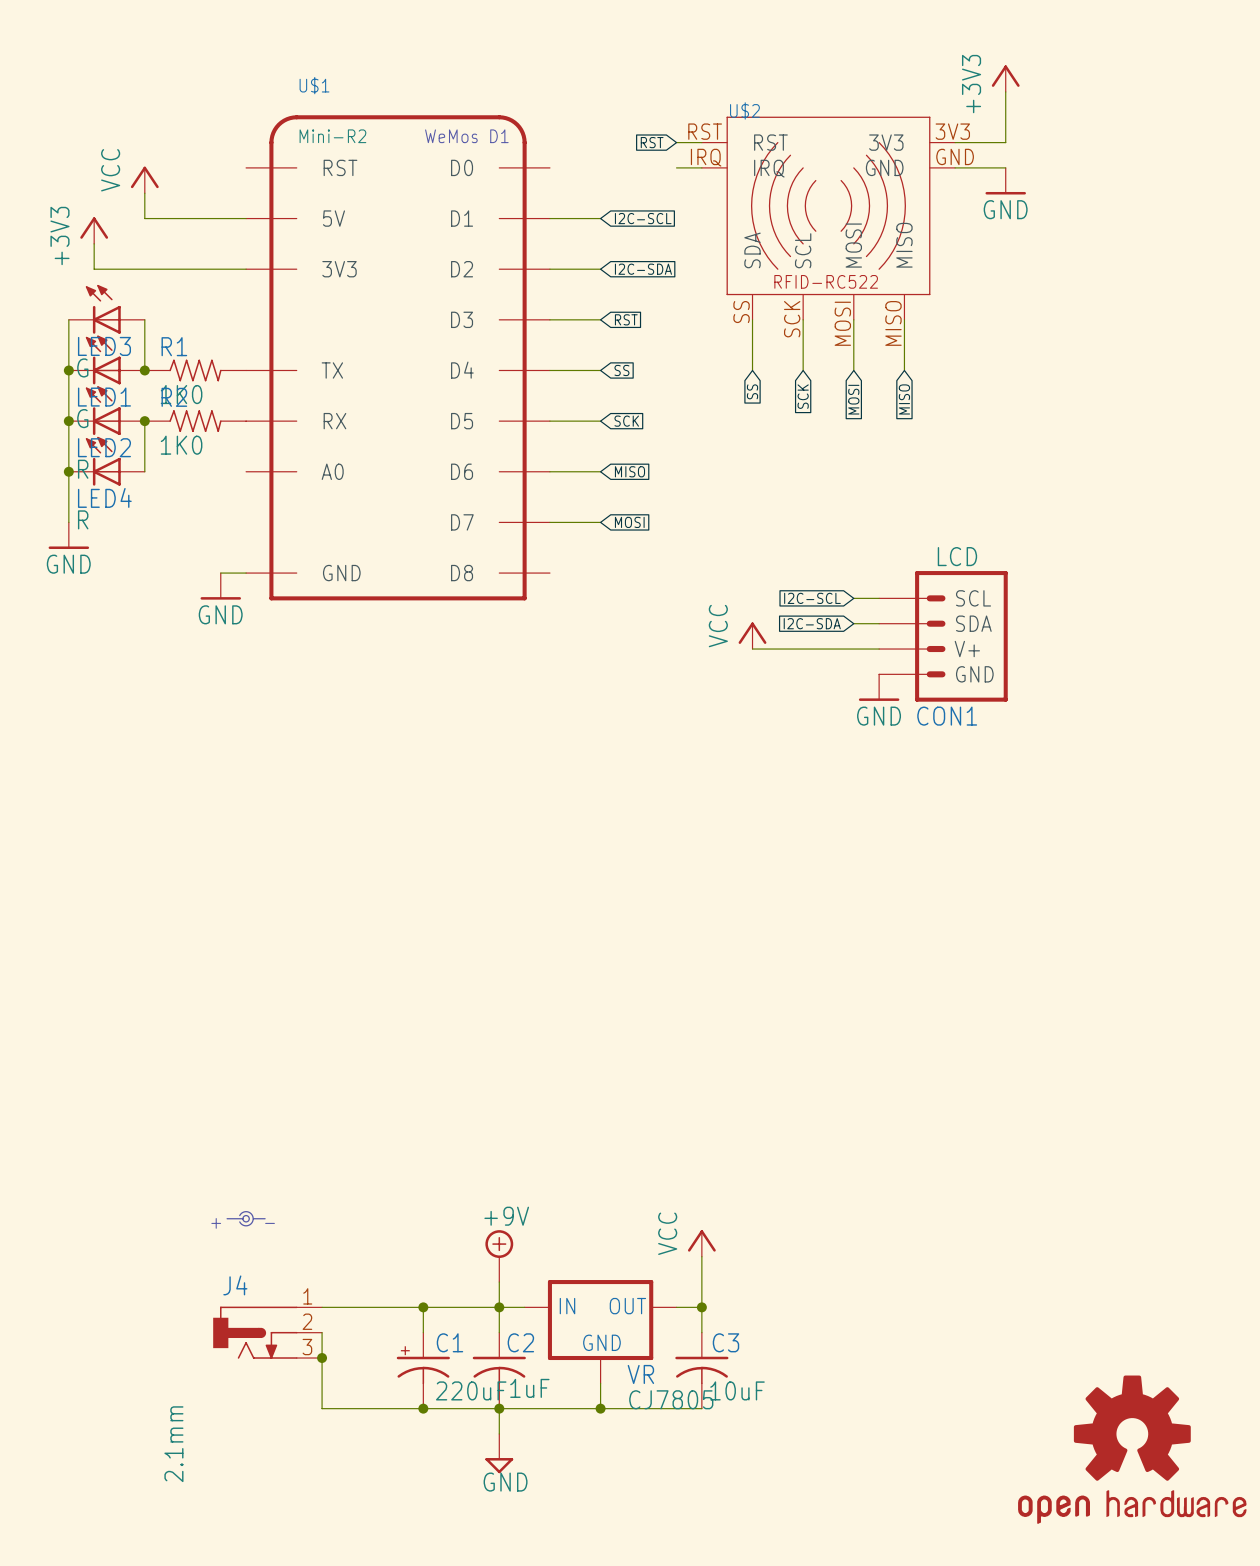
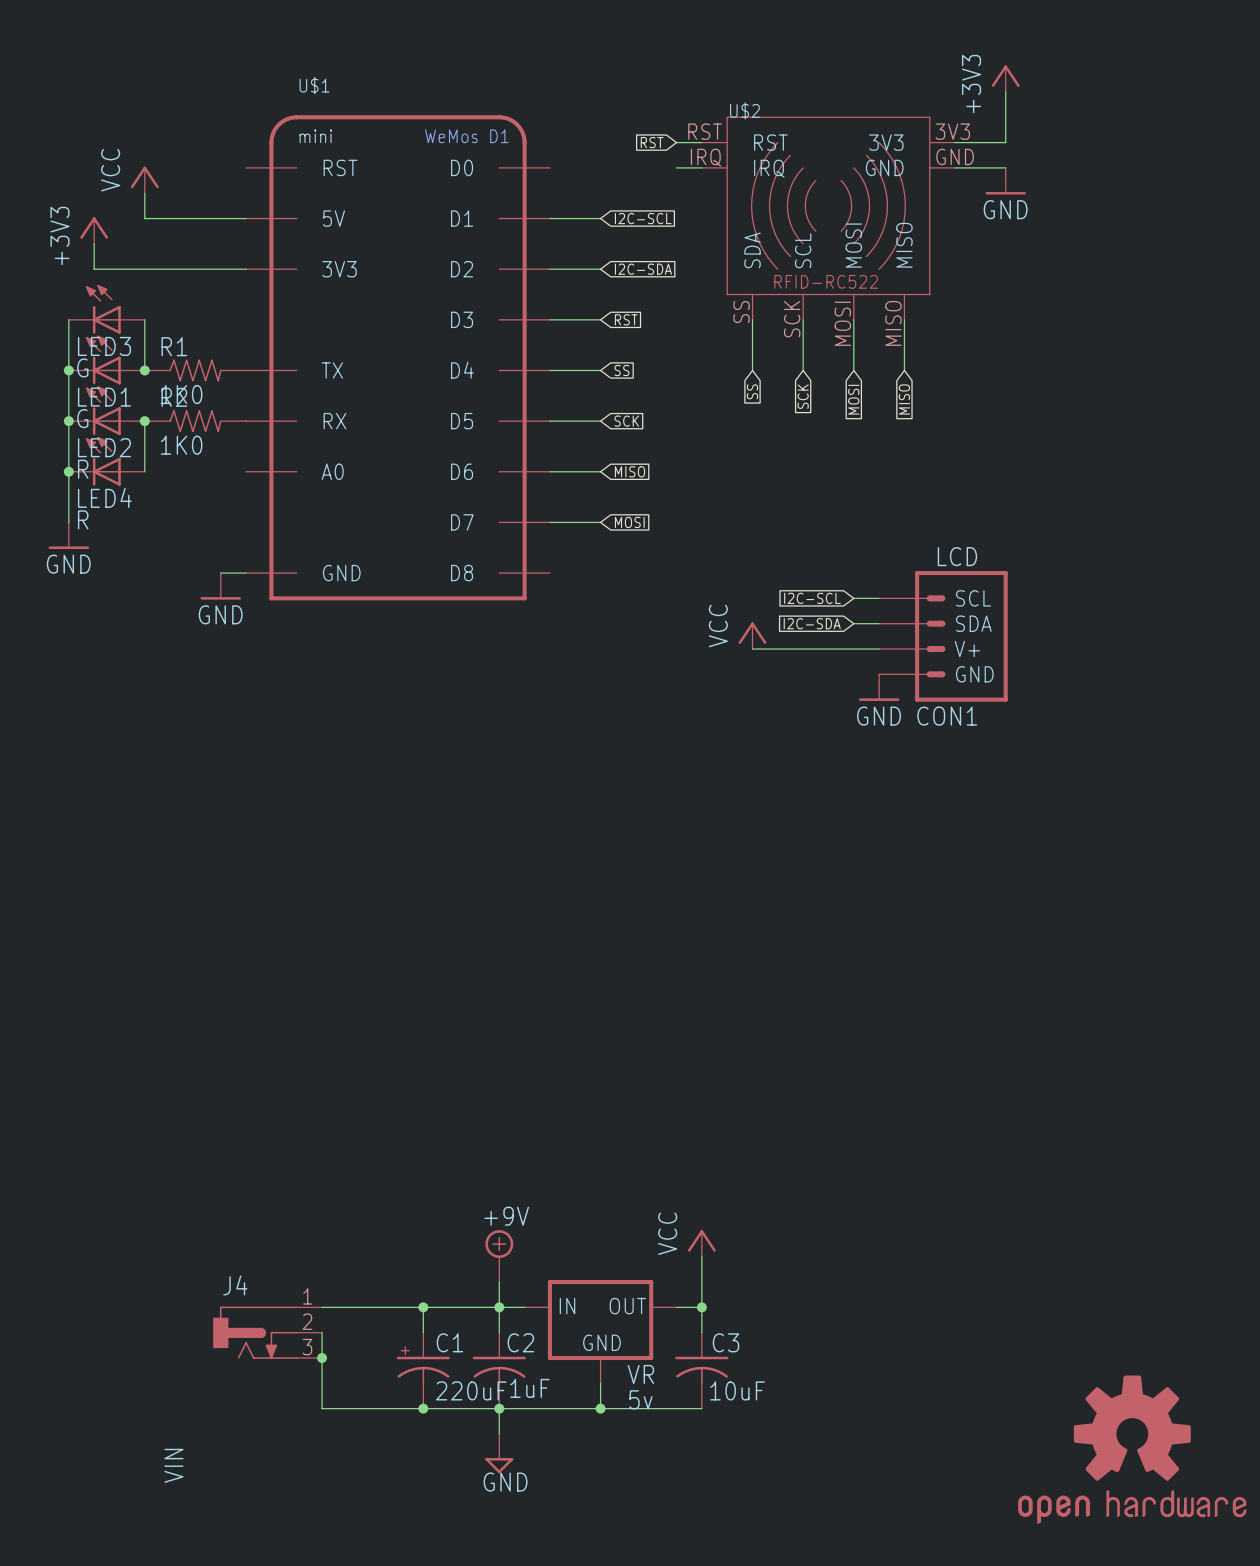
U$1 value: Mini-R2 (332, 136) -> mini (315, 136)
part: (246, 1218) -> none
VR value: CJ7805 (671, 1399) -> 5v (640, 1399)
J4 value: 2.1mm (173, 1444) -> VIN (173, 1465)

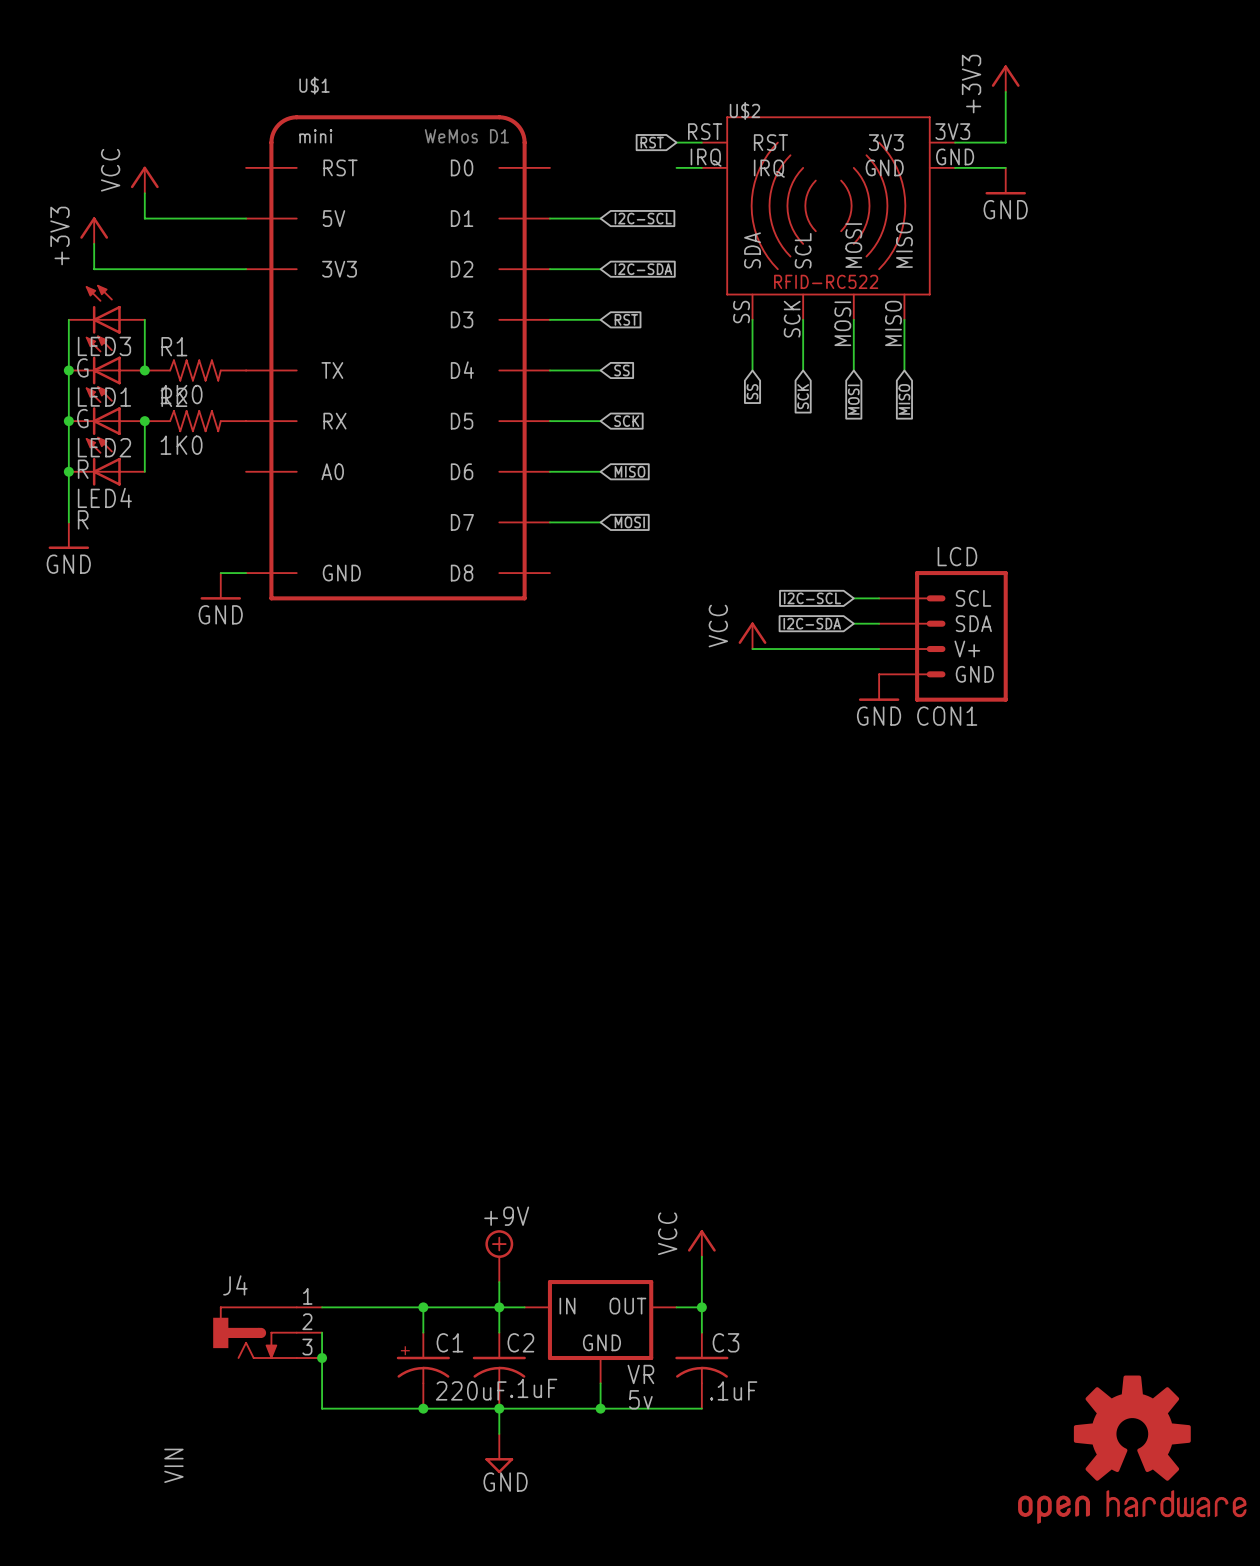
C2 value: 1uF (529, 1388) -> .1uF (533, 1388)
C3 value: 10uF (737, 1390) -> .1uF (733, 1390)

